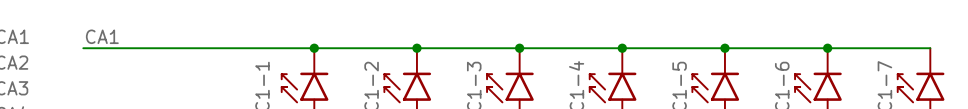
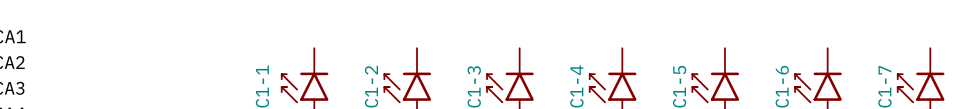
label: CA1 (102, 36) -> none
wire: (83, 48) (930, 48) -> none
junction: (314, 48) -> none
junction: (416, 48) -> none
junction: (519, 48) -> none
junction: (622, 48) -> none
junction: (724, 48) -> none
junction: (827, 48) -> none

